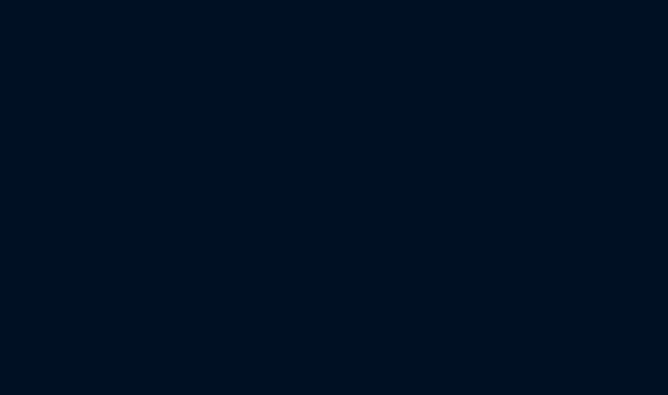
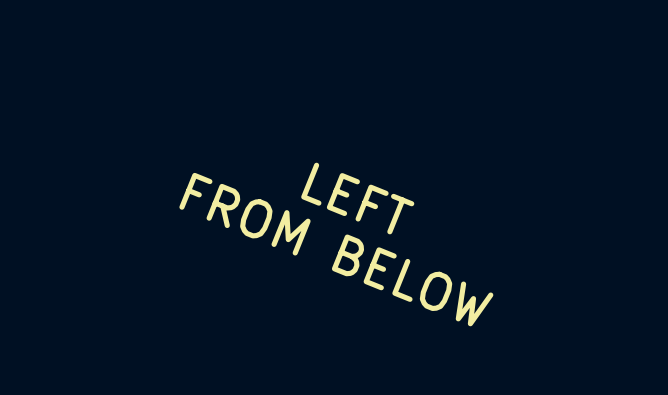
text: none -> LEFT (357, 198)
text: none -> FROM BELOW (336, 249)

